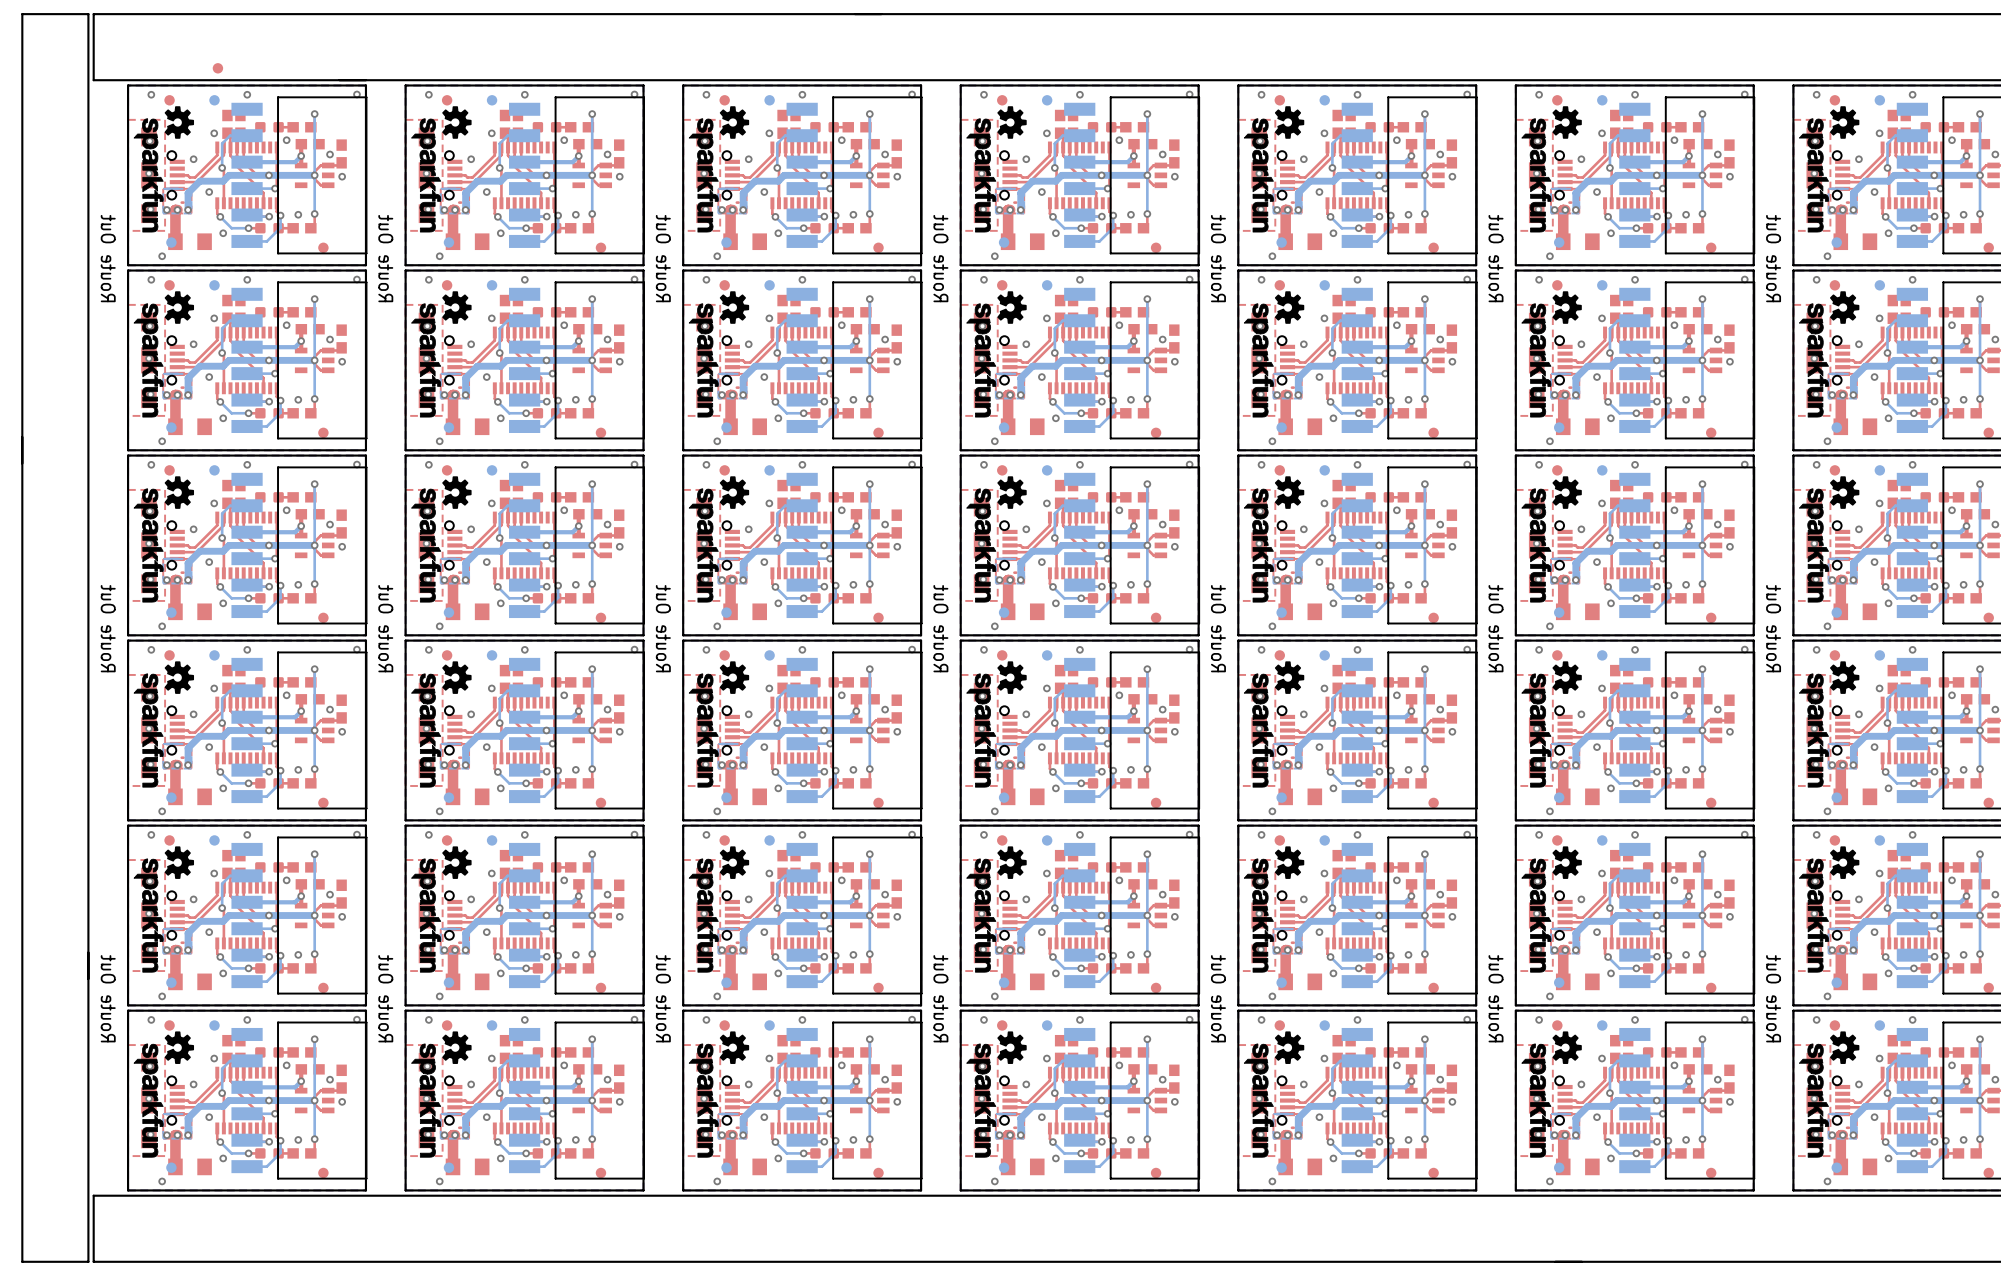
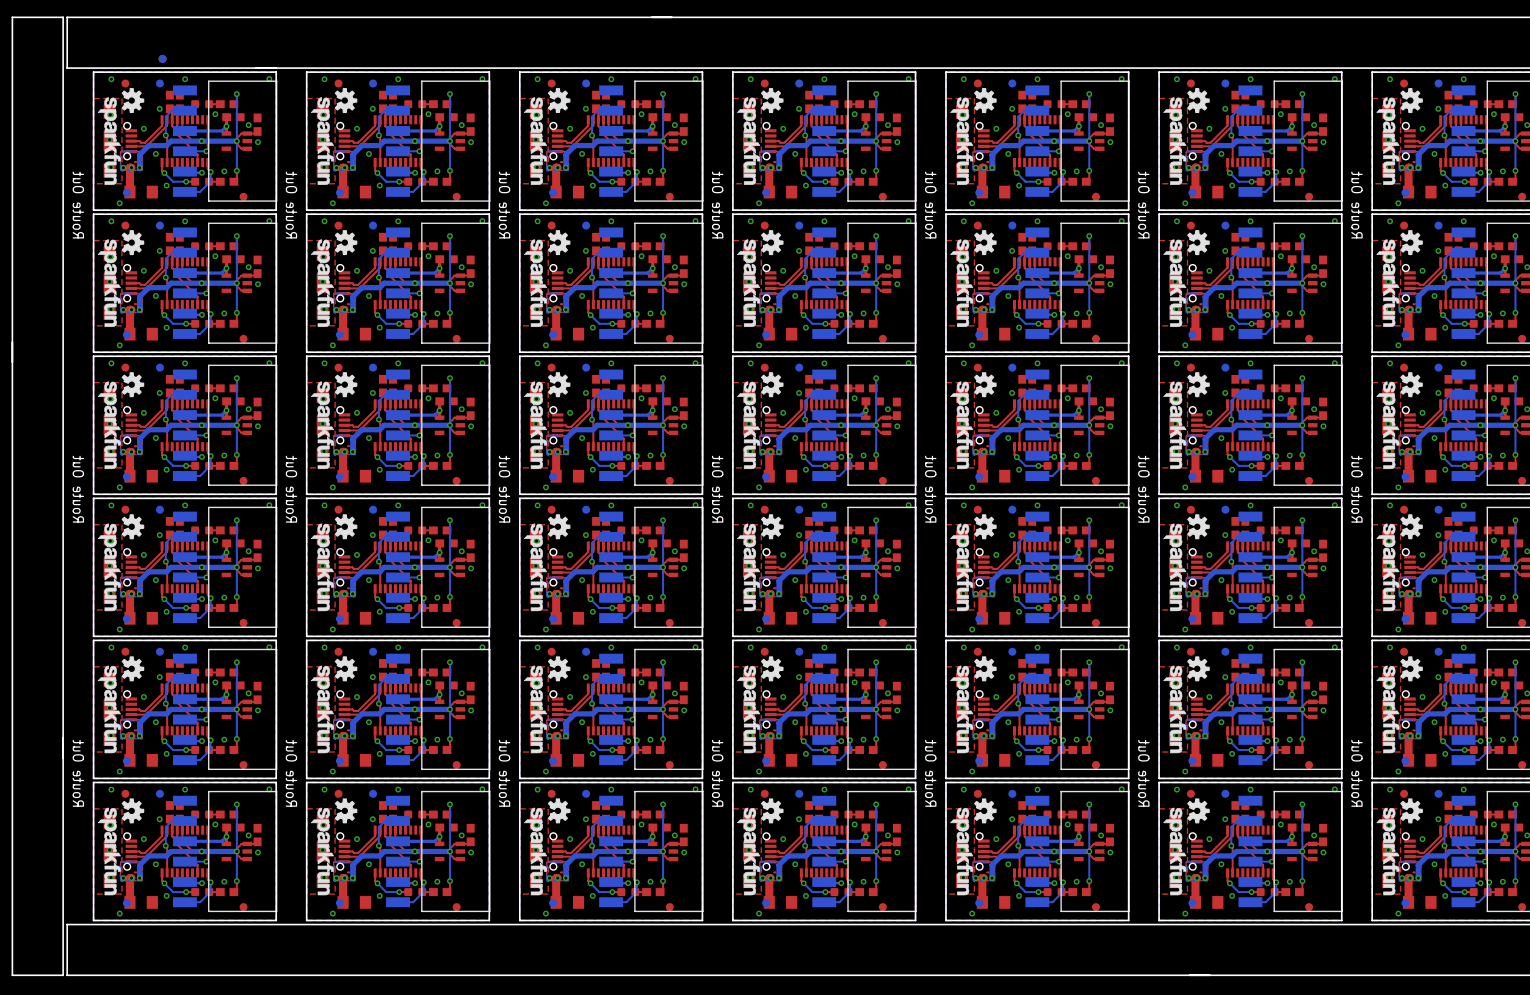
part: none -> (162, 58)

